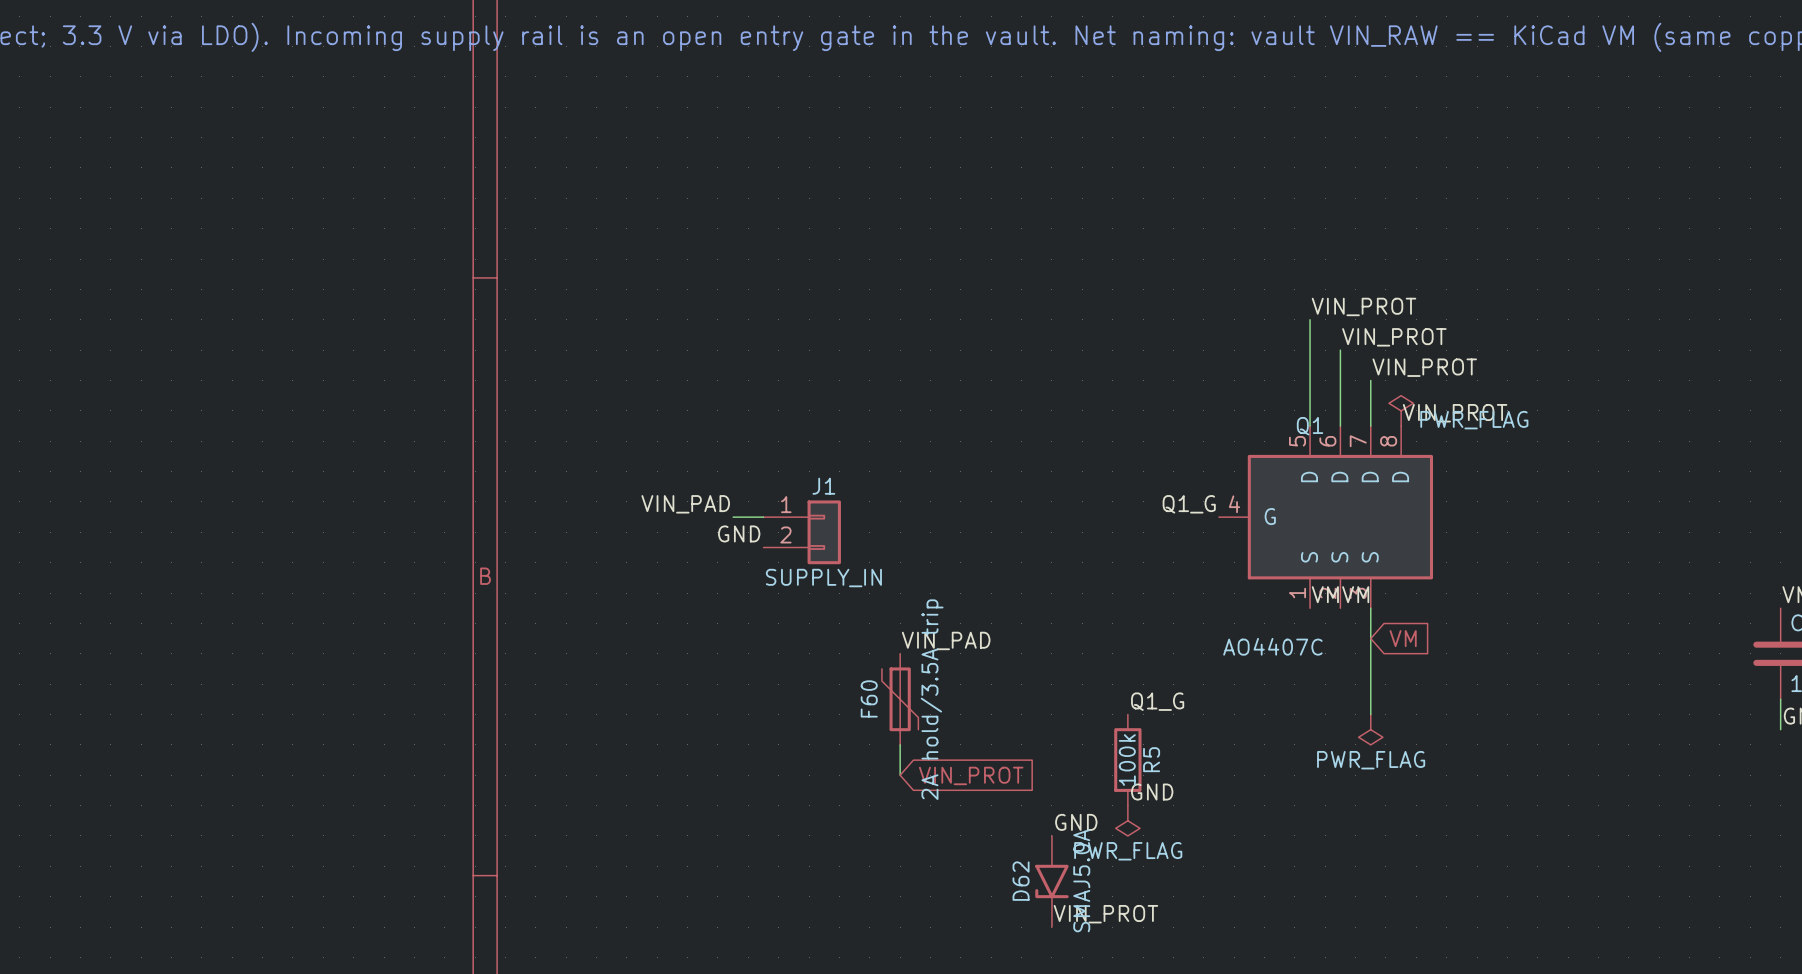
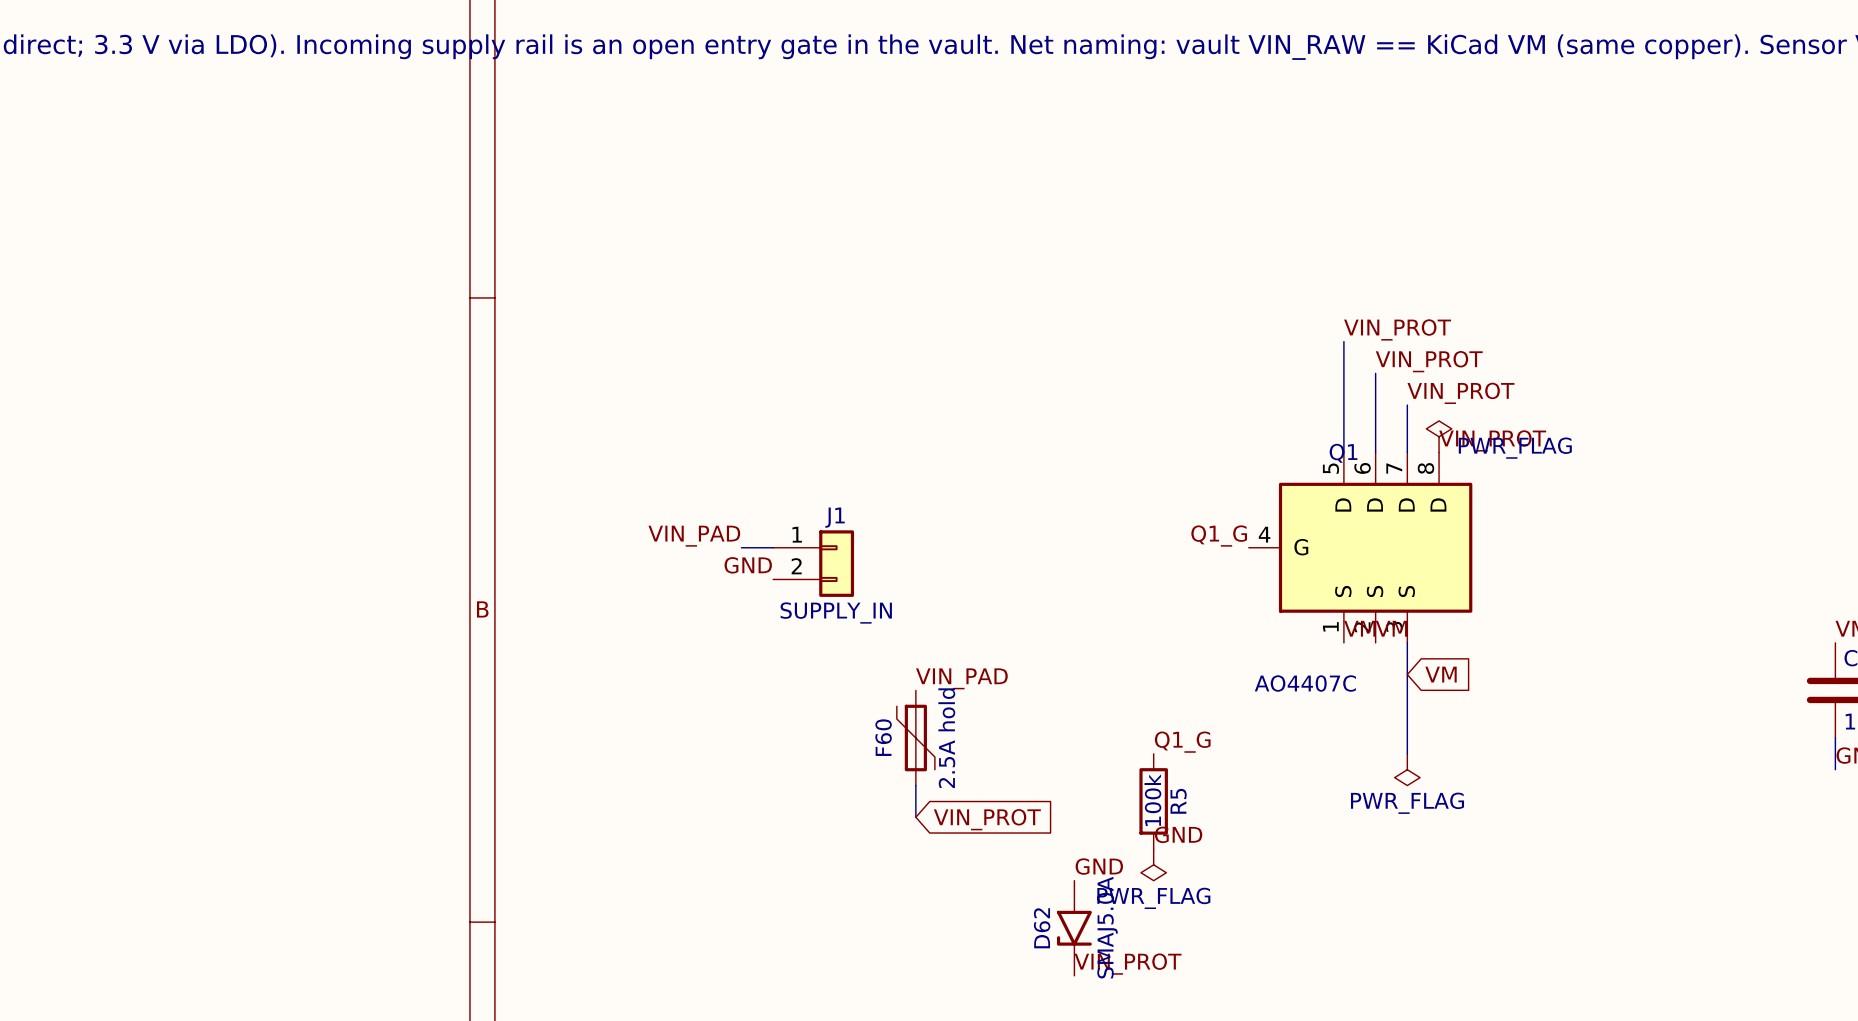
F60 value: 2A hold/3.5A trip (932, 699) -> 2.5A hold (946, 738)

